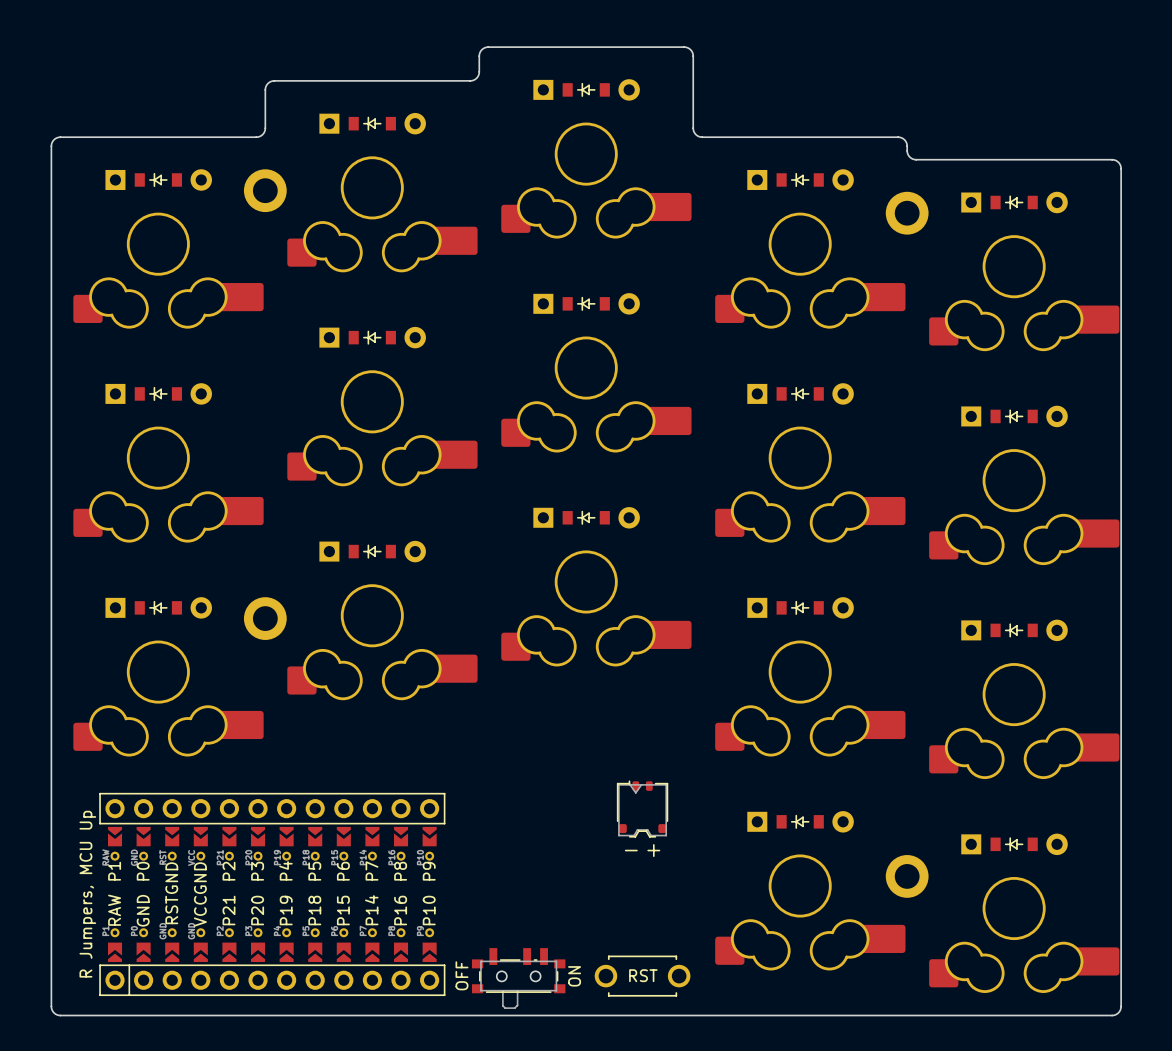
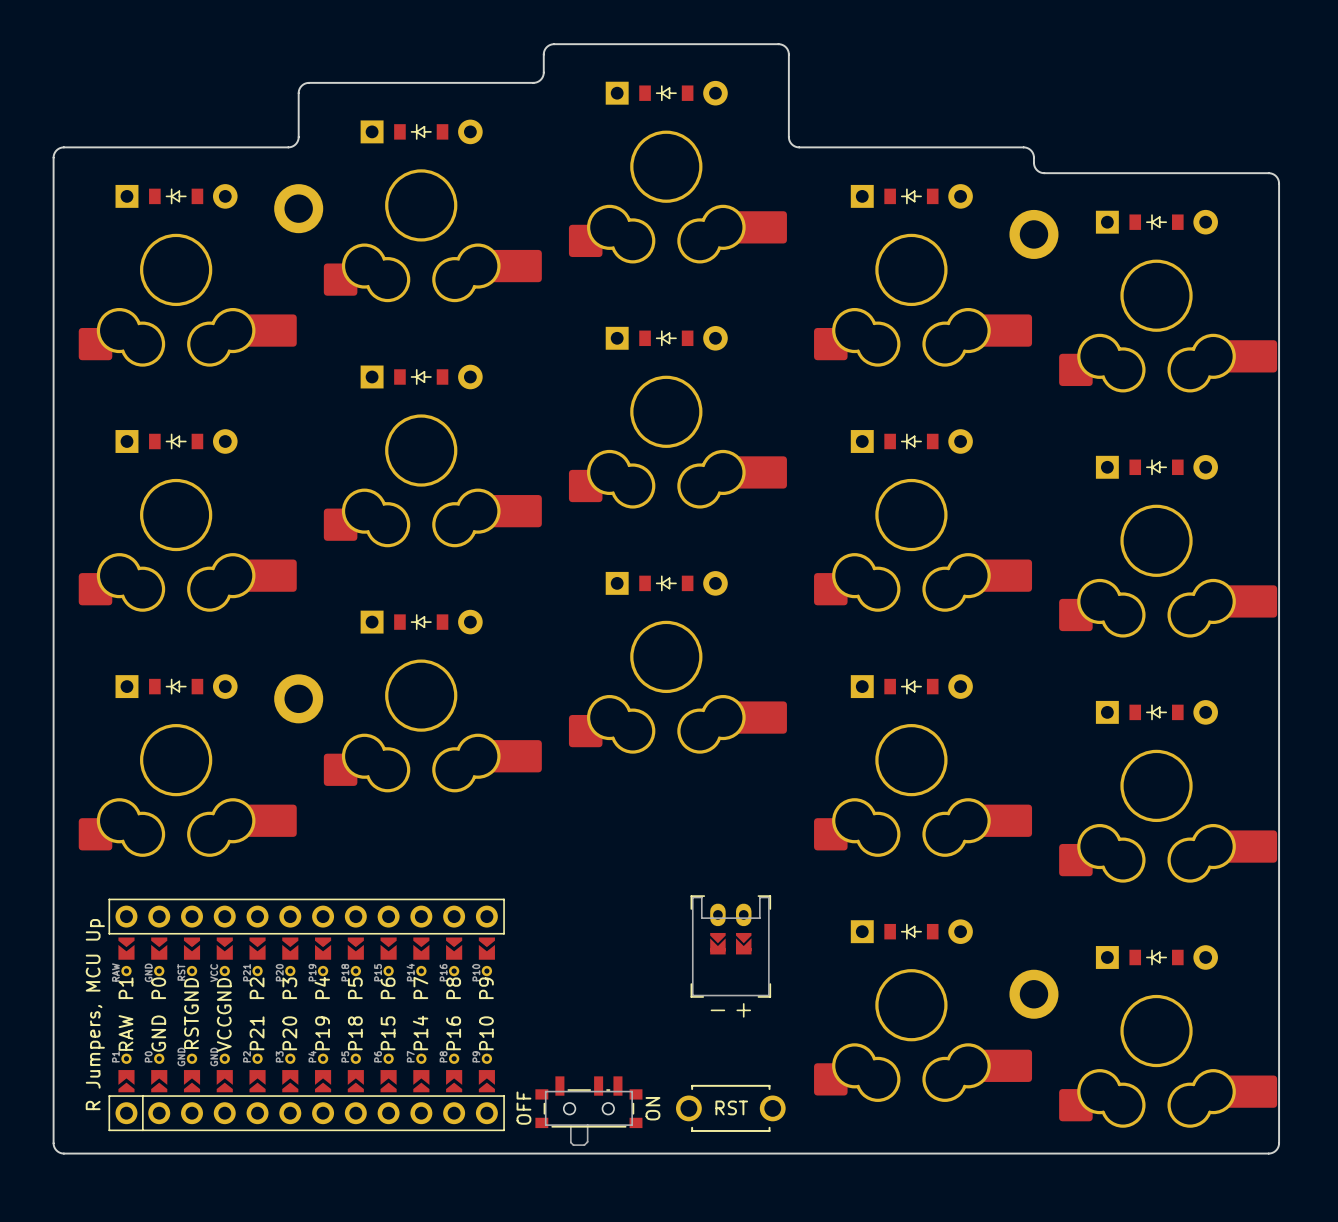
part: (642, 818) -> none
part: none -> (730, 956)

